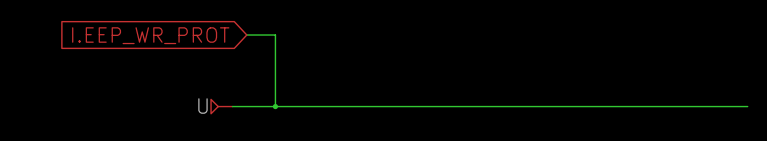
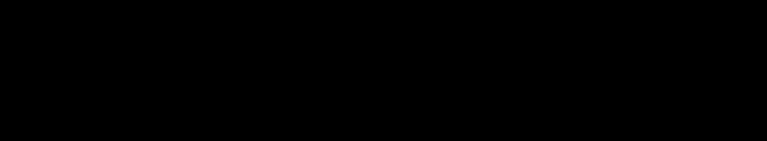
global label: I.EEP_WR_PROT (150, 35) -> none
wire: (246, 35) (275, 35) (275, 106) -> none
U: (221, 106) -> none
wire: (232, 106) (747, 106) -> none
junction: (275, 106) -> none

